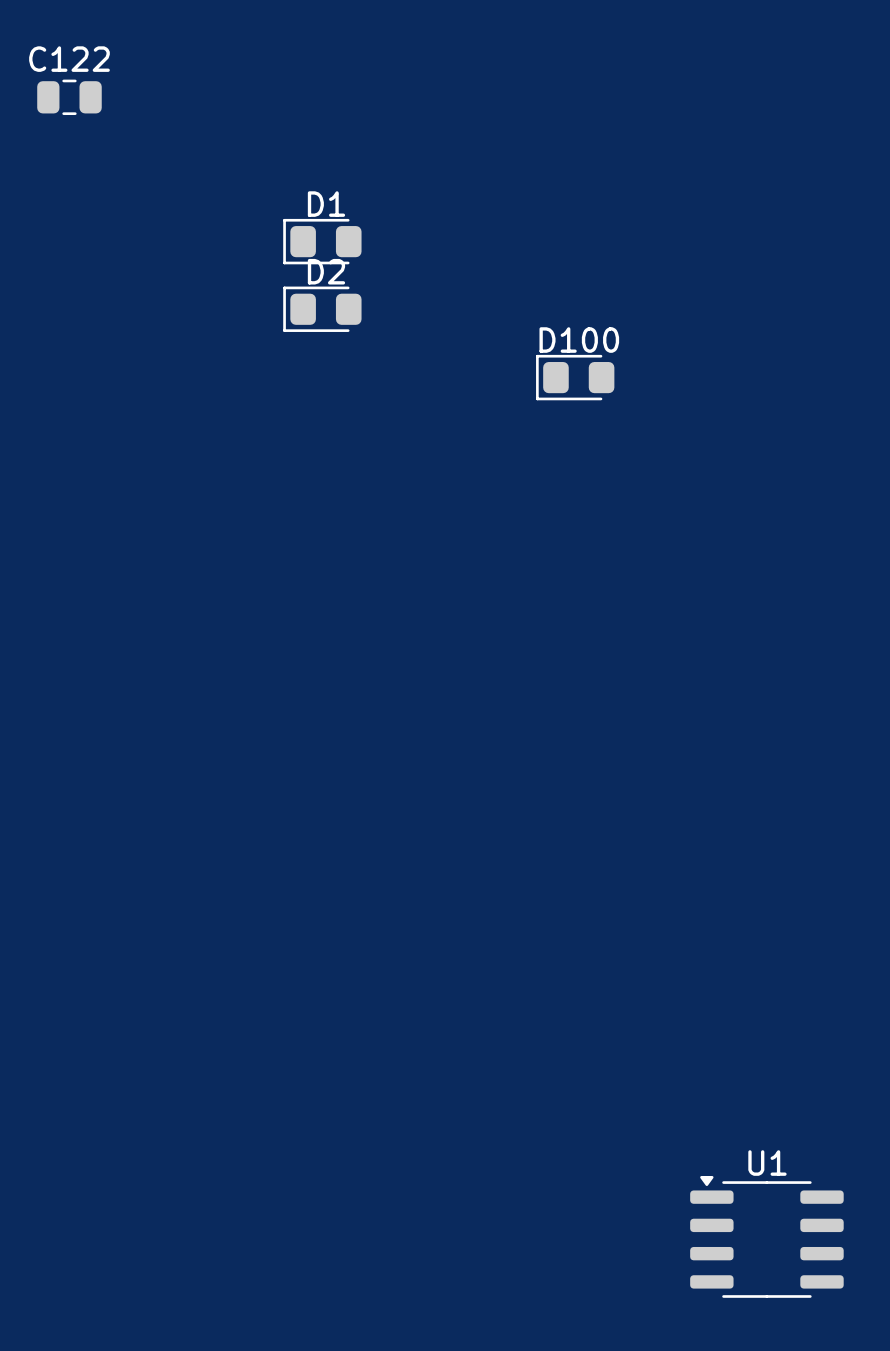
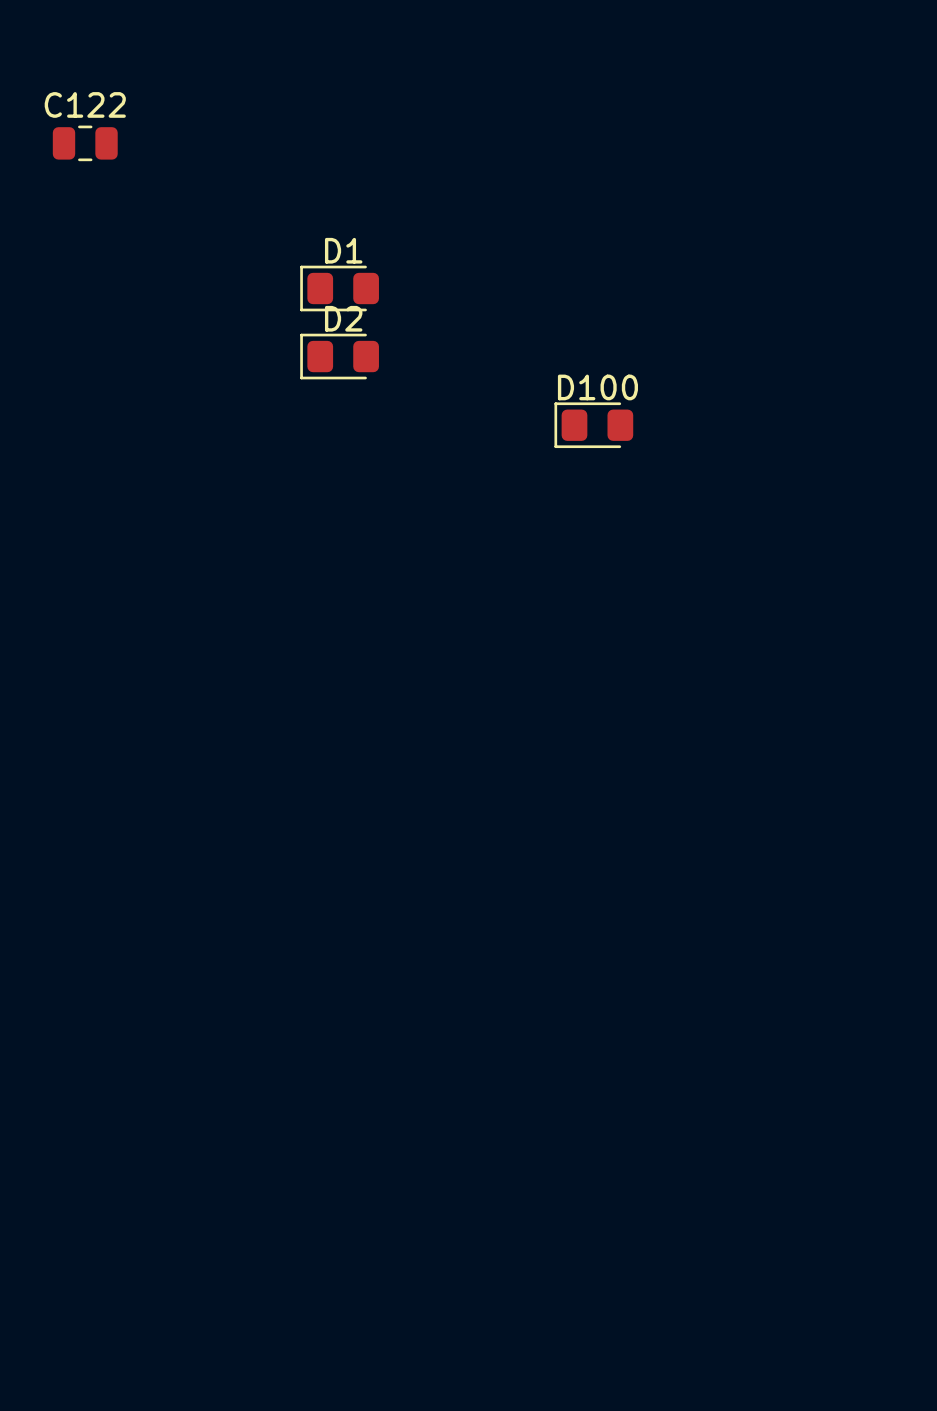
U1: (766, 1236) -> none

